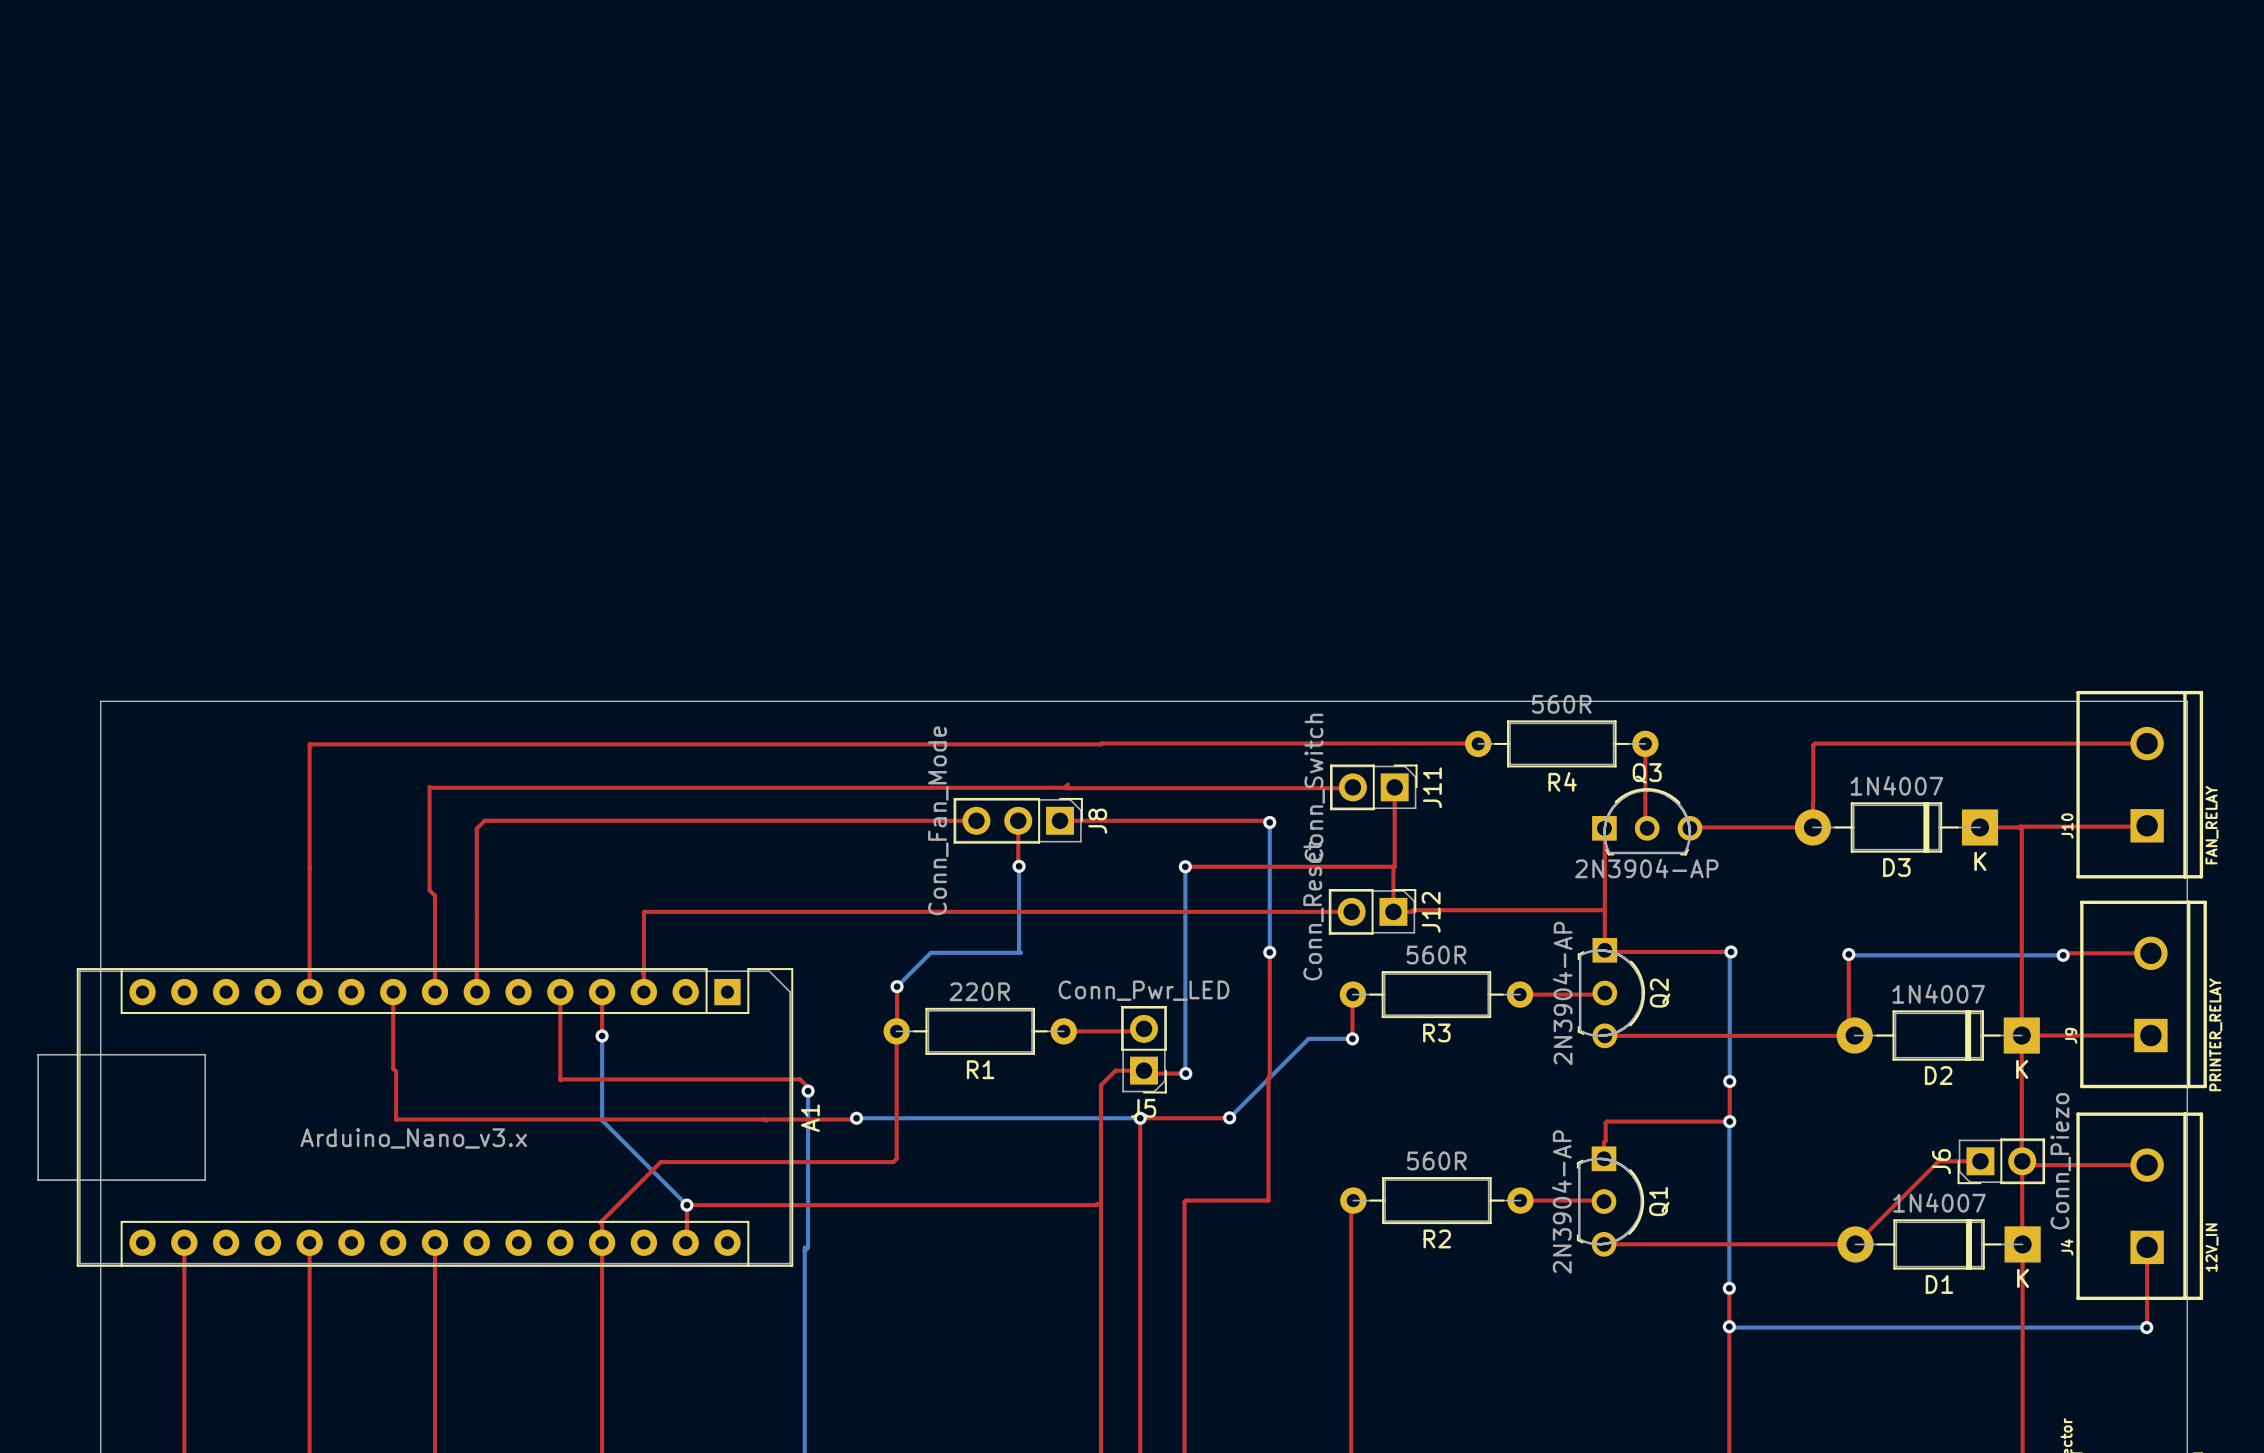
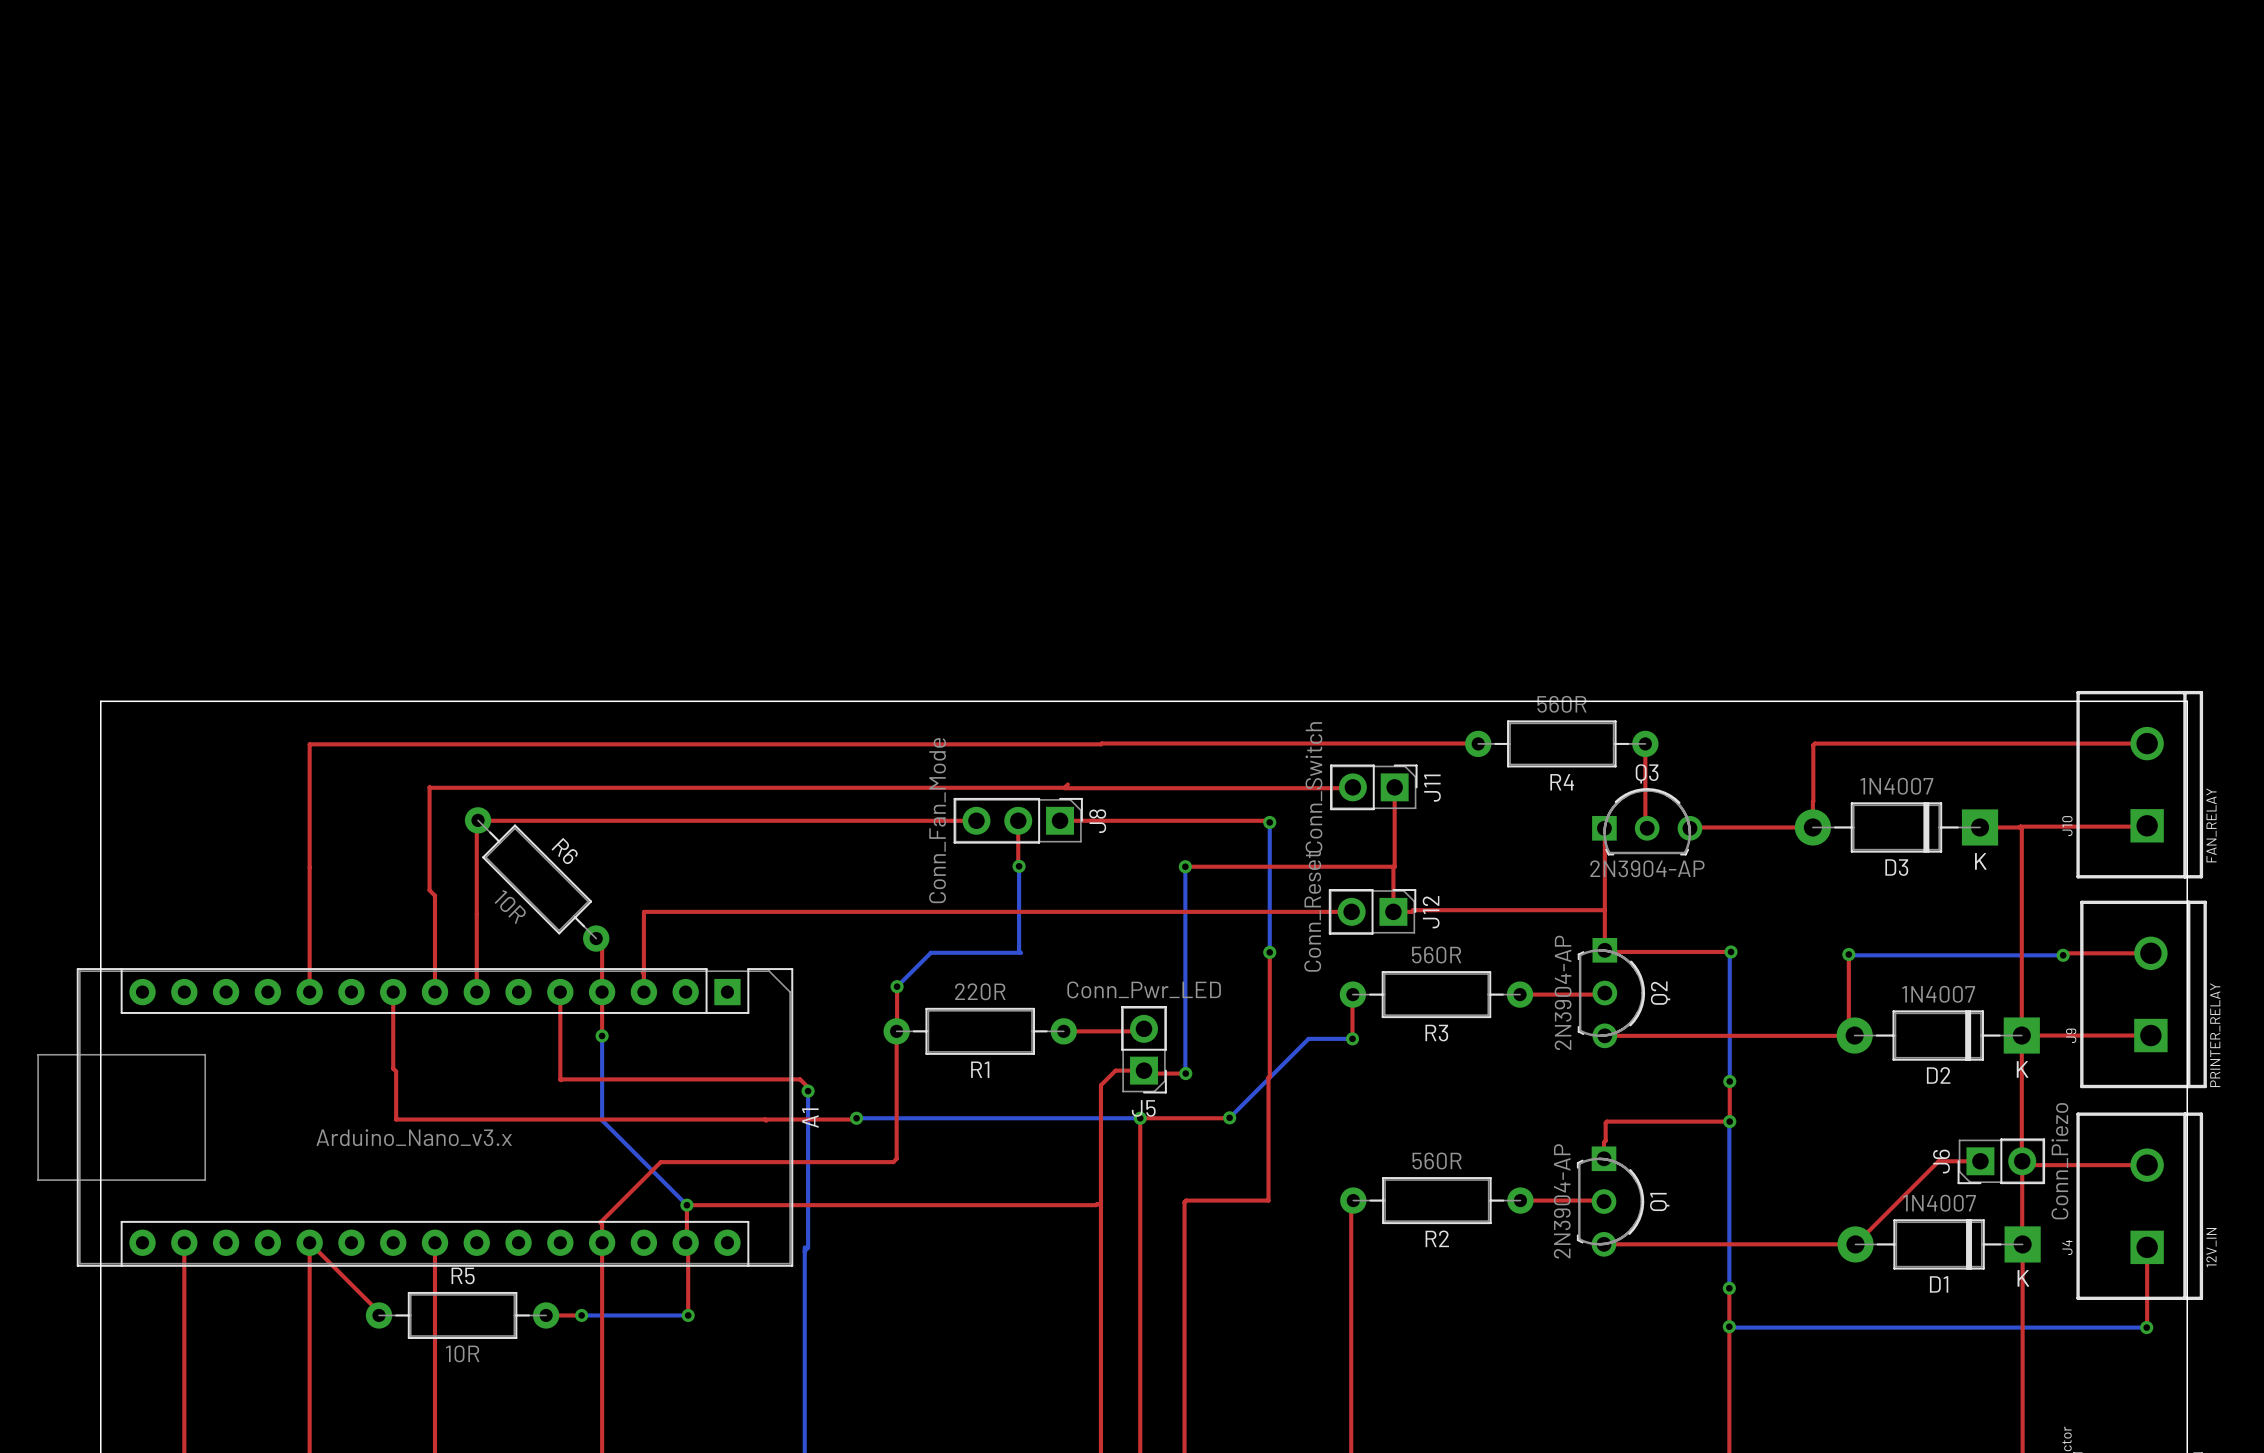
R6: none -> 10R (537, 879)
top track: none -> (596, 938) (602, 944) (602, 992)
top track: none -> (309, 1242) (379, 1312) (379, 1315)
top track: none -> (685, 1242) (688, 1245) (688, 1315)
R5: none -> 10R (462, 1315)
top track: none -> (546, 1315) (581, 1315)
bottom track: none -> (581, 1315) (688, 1315)
via: none -> (581, 1315)
via: none -> (688, 1315)

